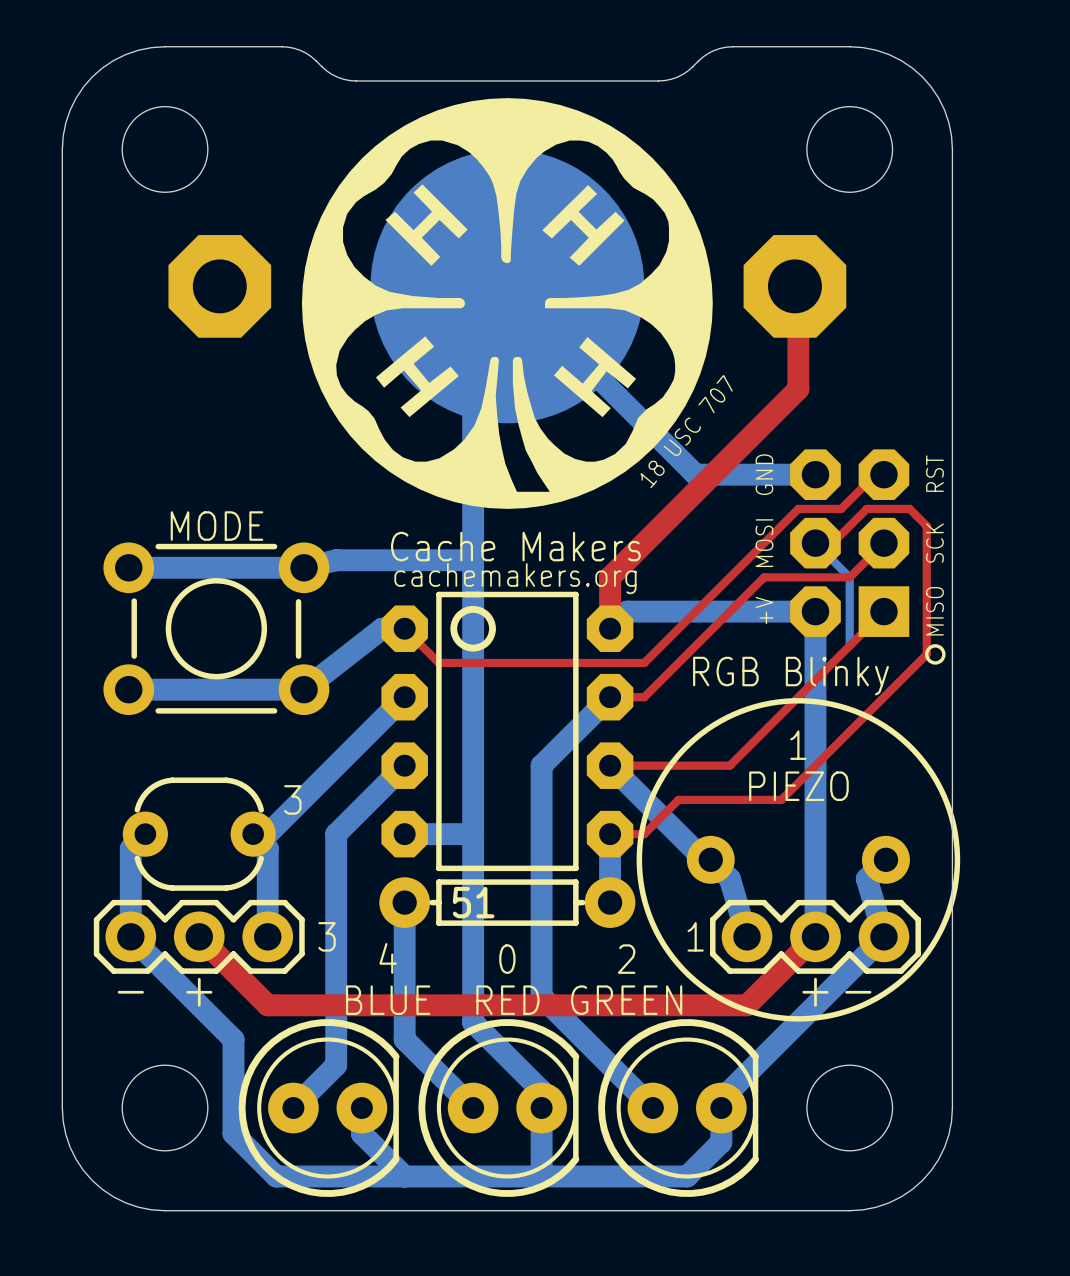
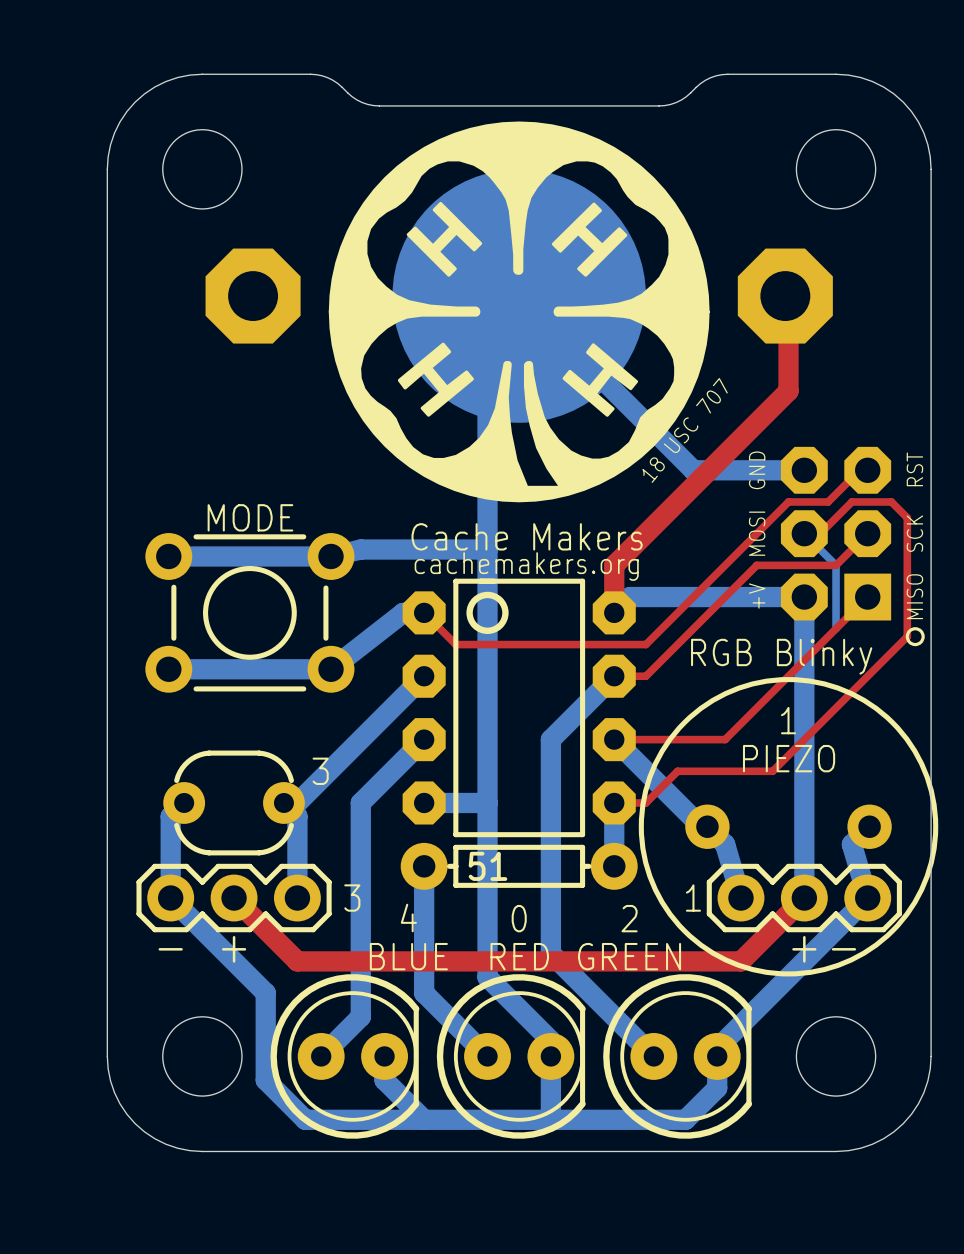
drawing shape: [301, 98, 713, 509] -> [328, 121, 710, 503]

